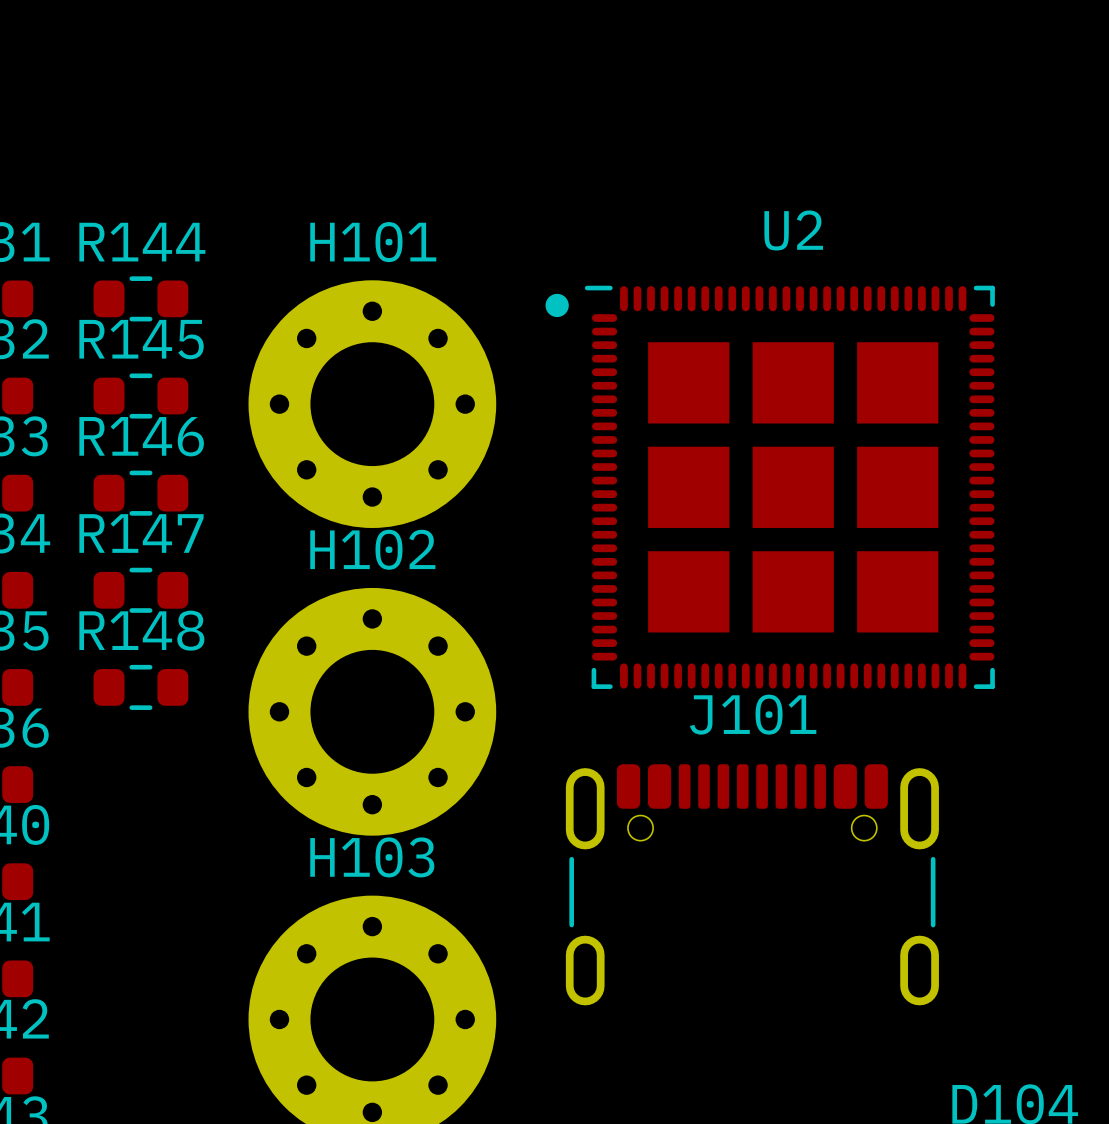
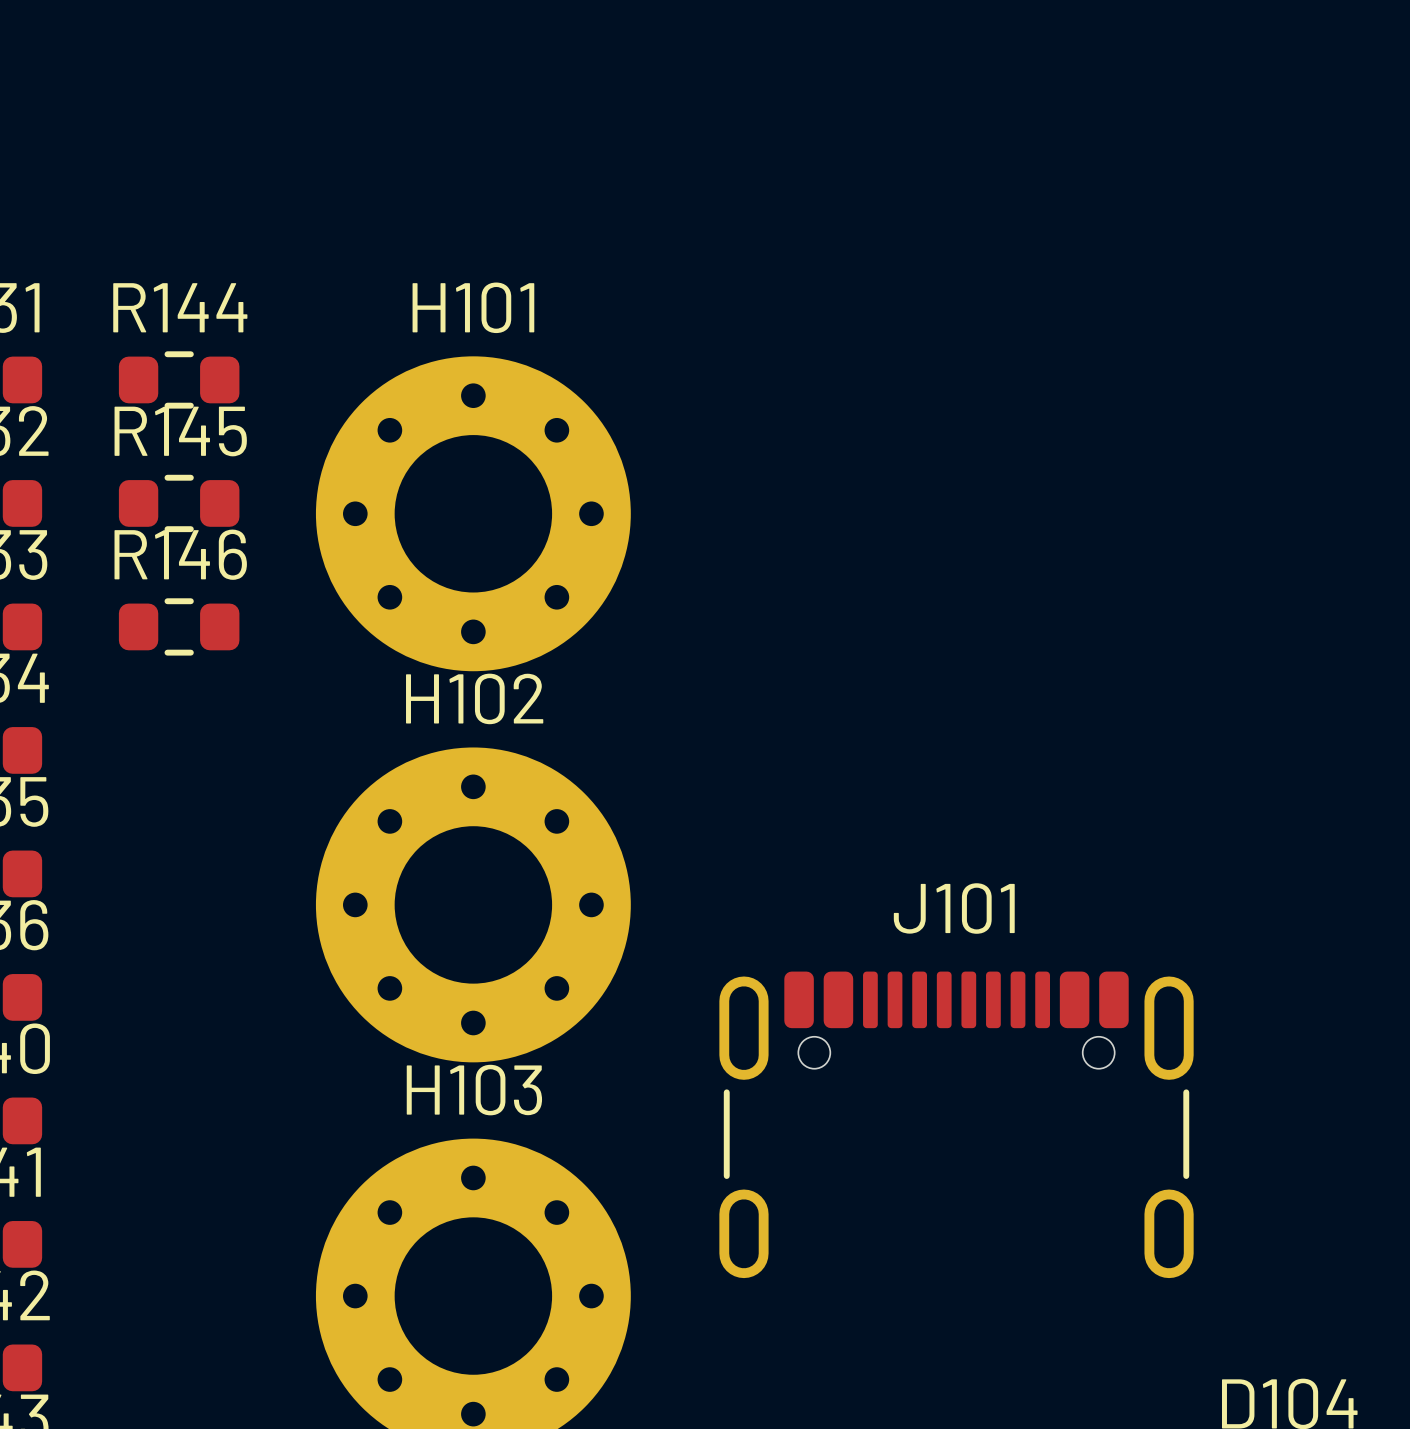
U2: (770, 487) -> none
R147: (140, 590) -> none
R148: (140, 687) -> none

